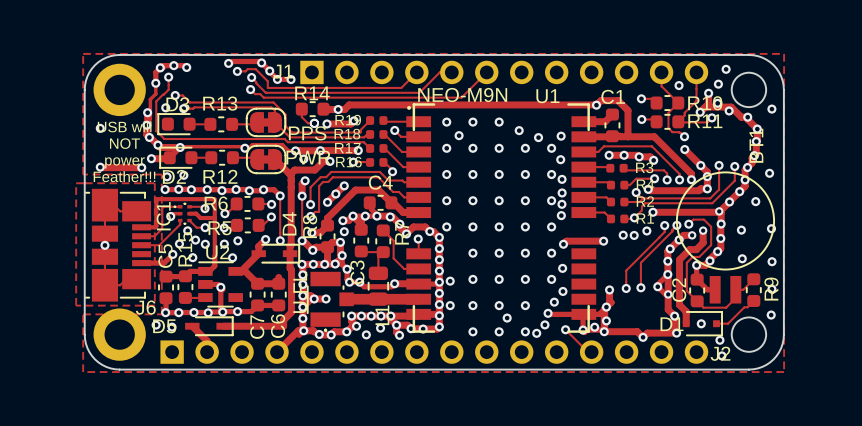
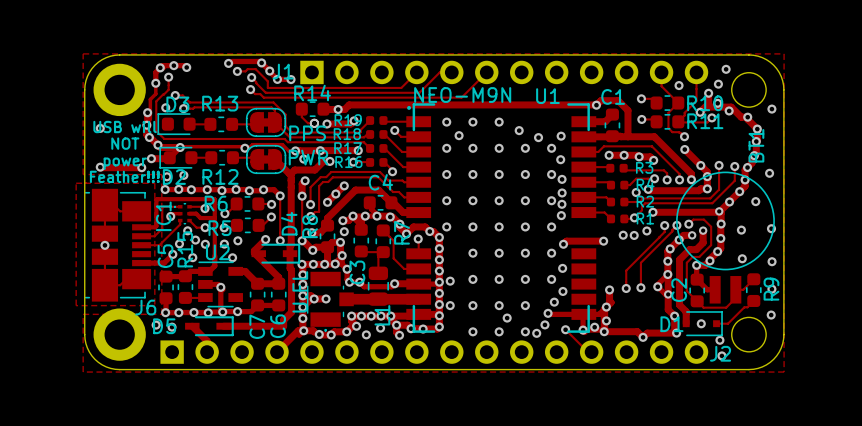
track: (258, 246) (258, 253) (241, 271) -> (258, 246) (254, 253) (278, 277)

